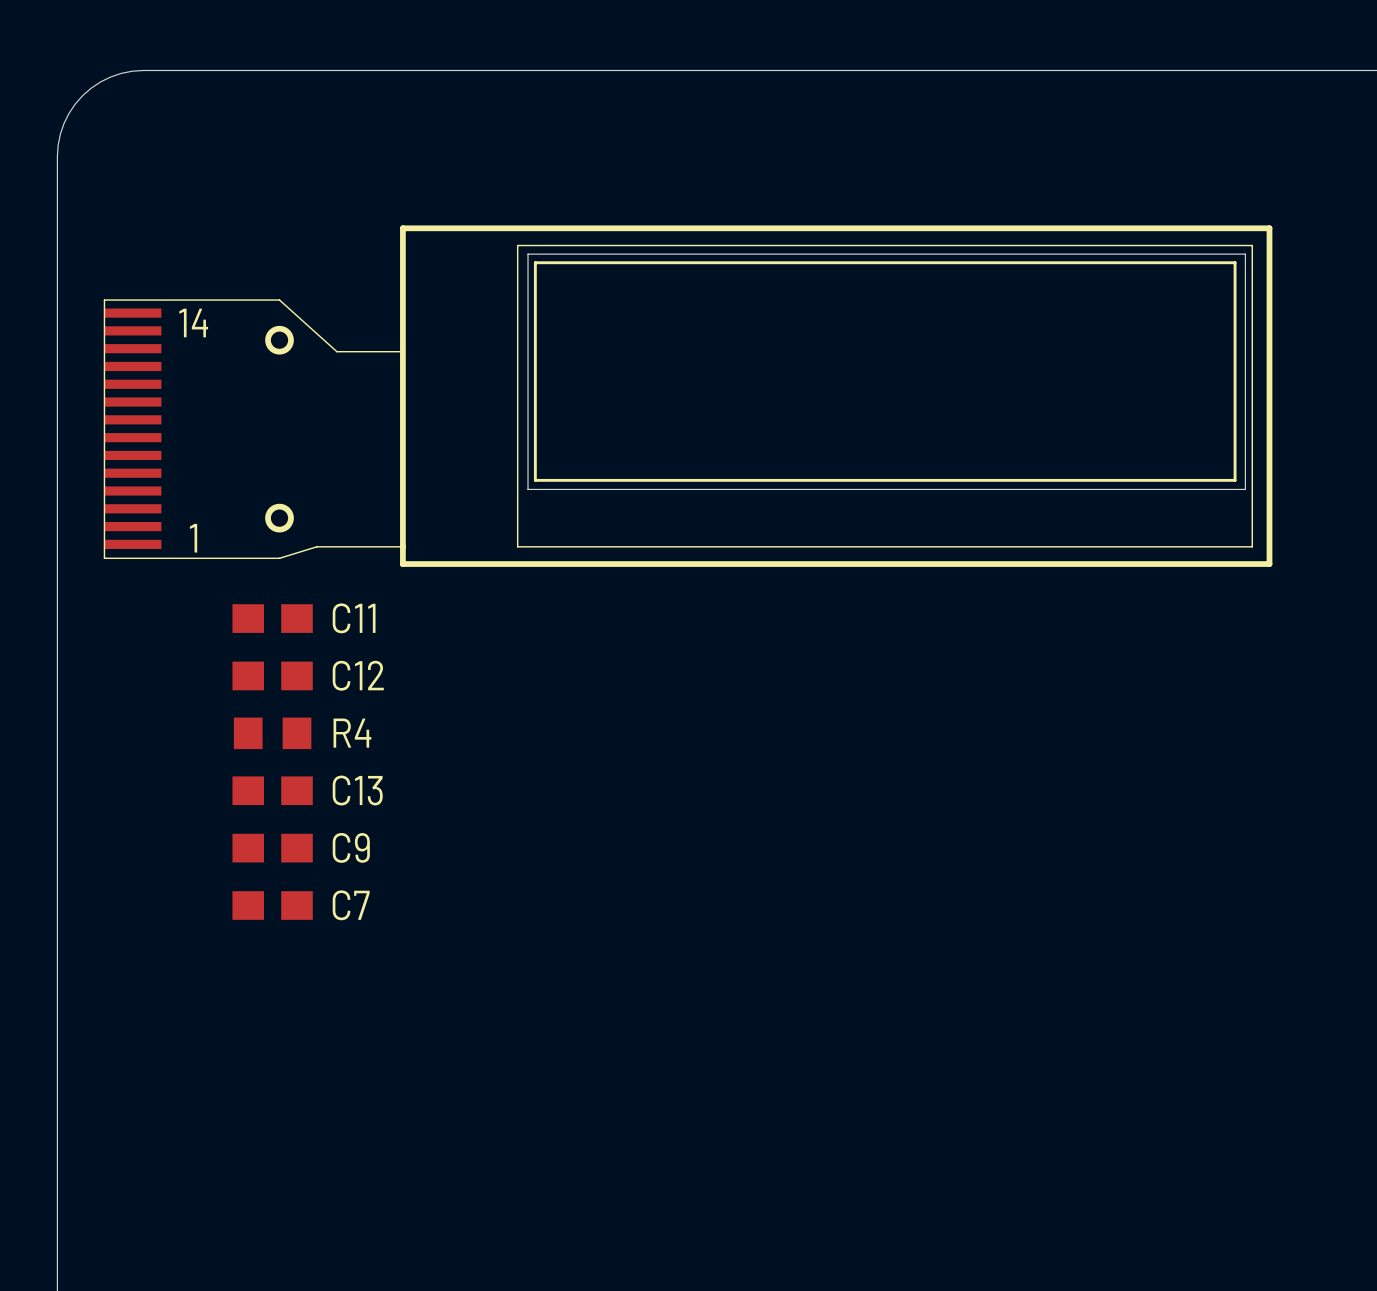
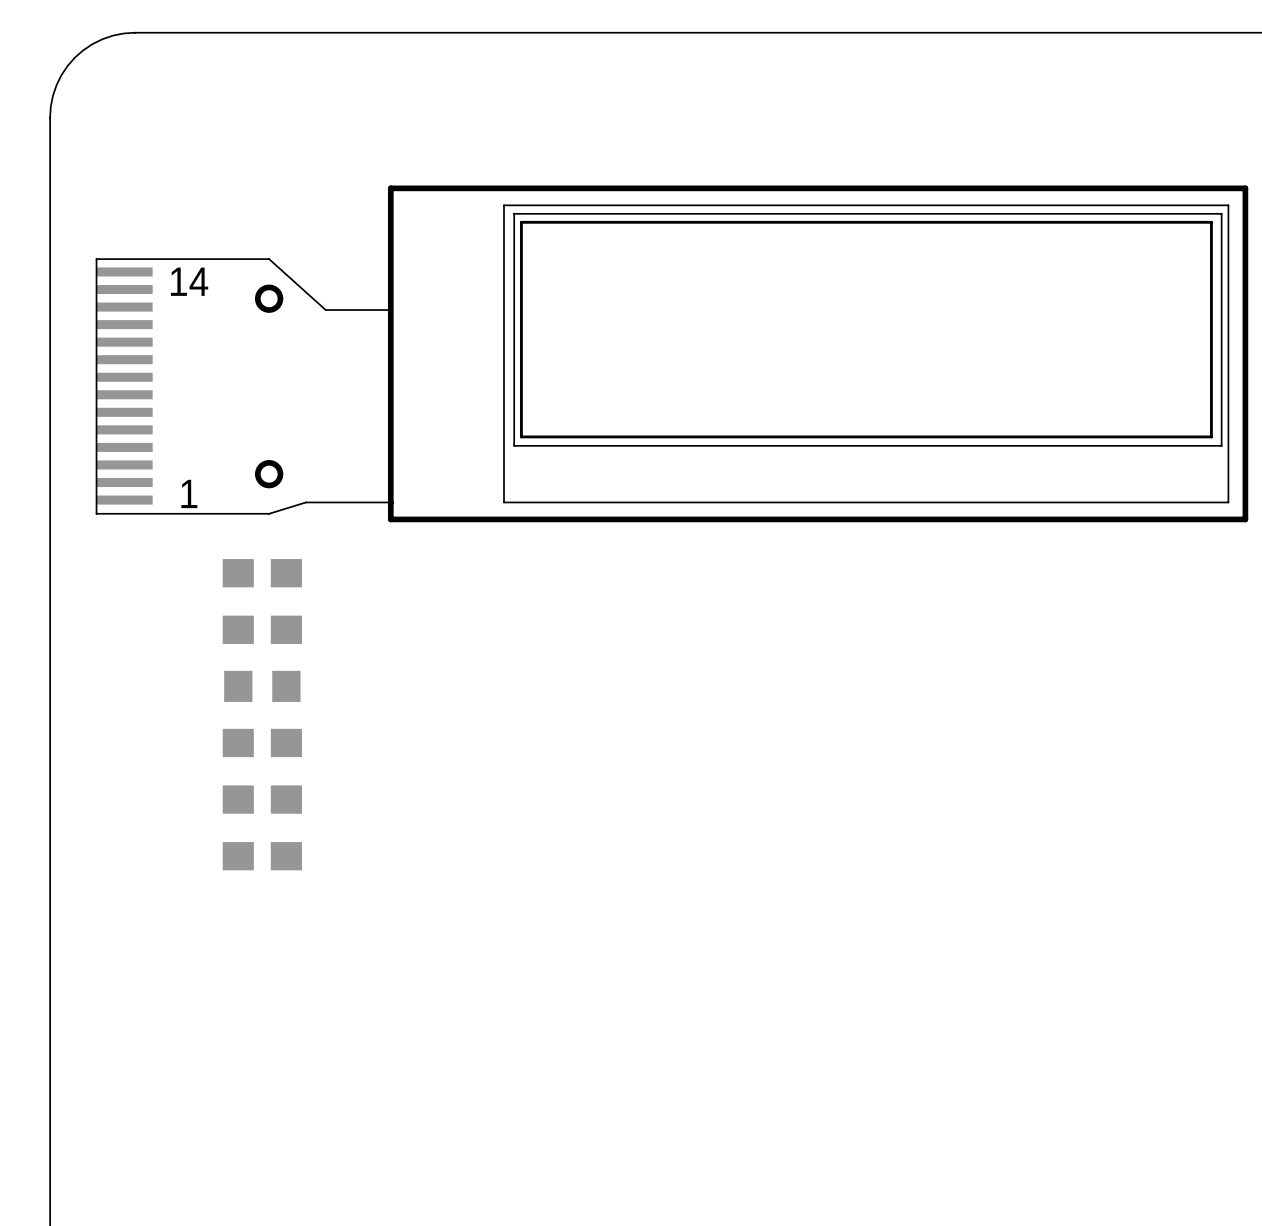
text: C11 (354, 618) -> none
text: C12 (358, 675) -> none
text: R4 (352, 733) -> none
text: C13 (357, 790) -> none
text: C9 (351, 847) -> none
text: C7 (351, 905) -> none

